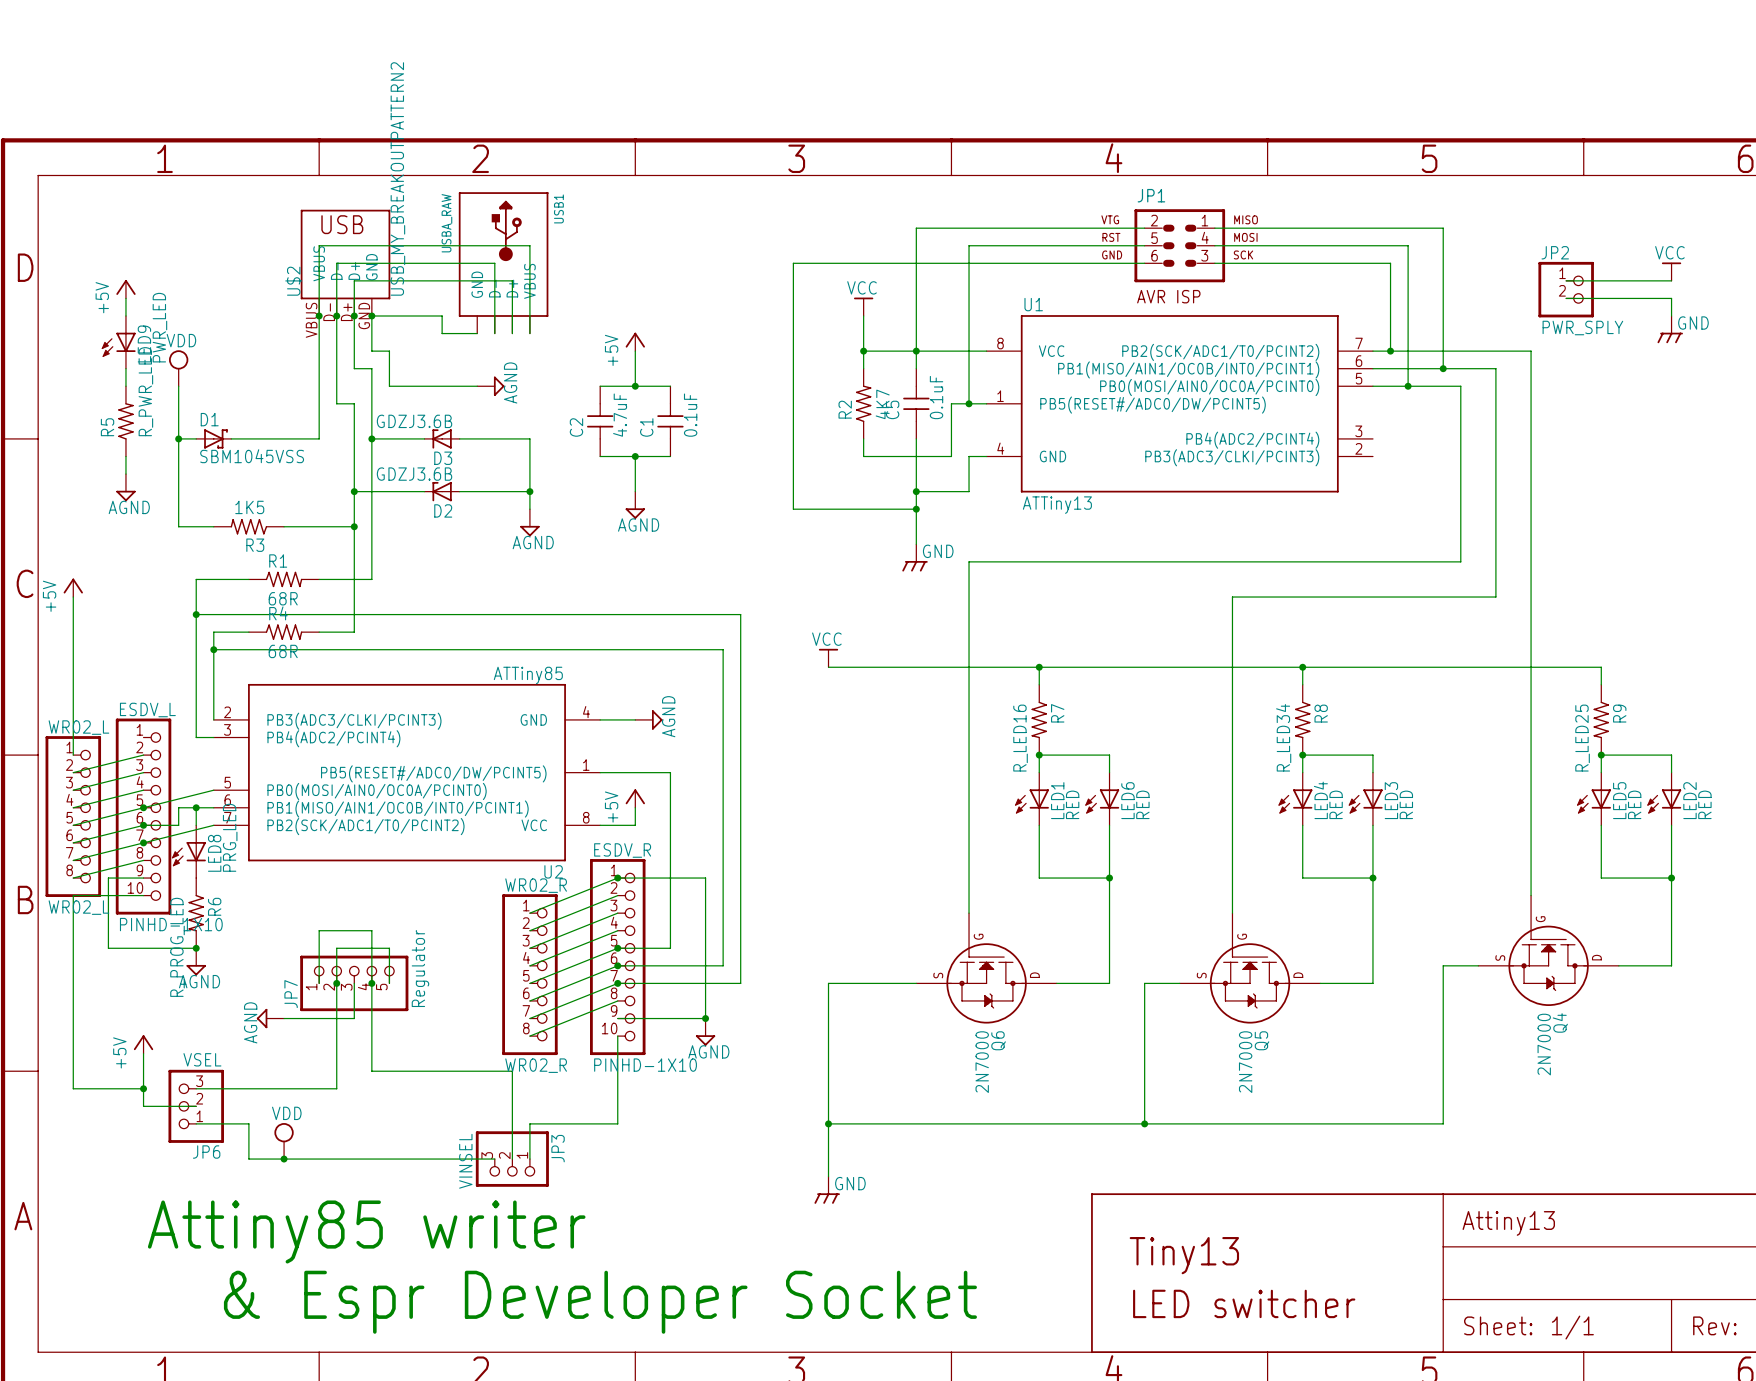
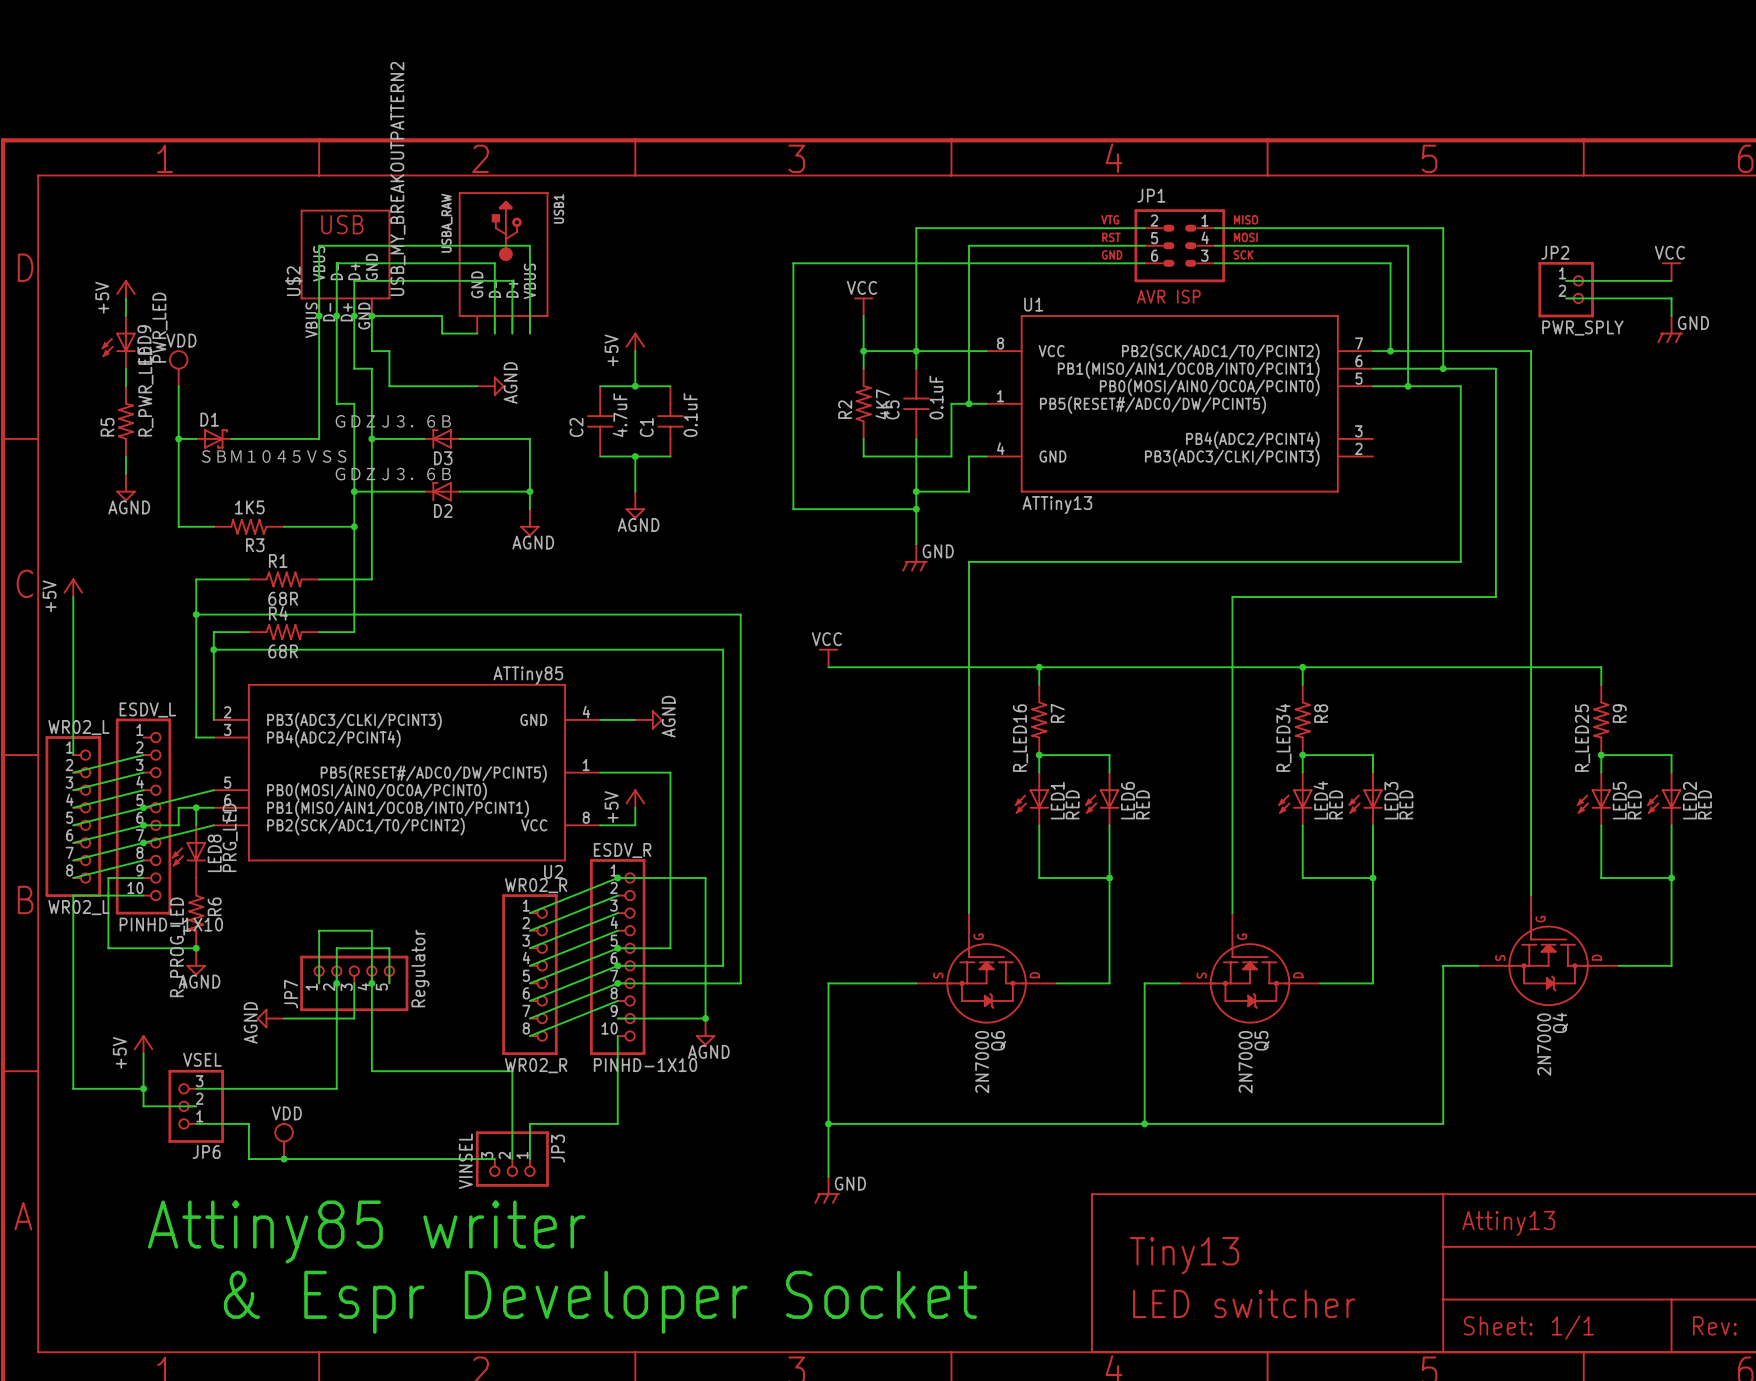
D3 value: GDZJ3.6B (414, 421) -> ＧＤＺＪ３．６Ｂ (393, 421)
D1 value: SBM1045VSS (252, 456) -> ＳＢＭ１０４５ＶＳＳ (274, 456)
D2 value: GDZJ3.6B (414, 474) -> ＧＤＺＪ３．６Ｂ (393, 474)

